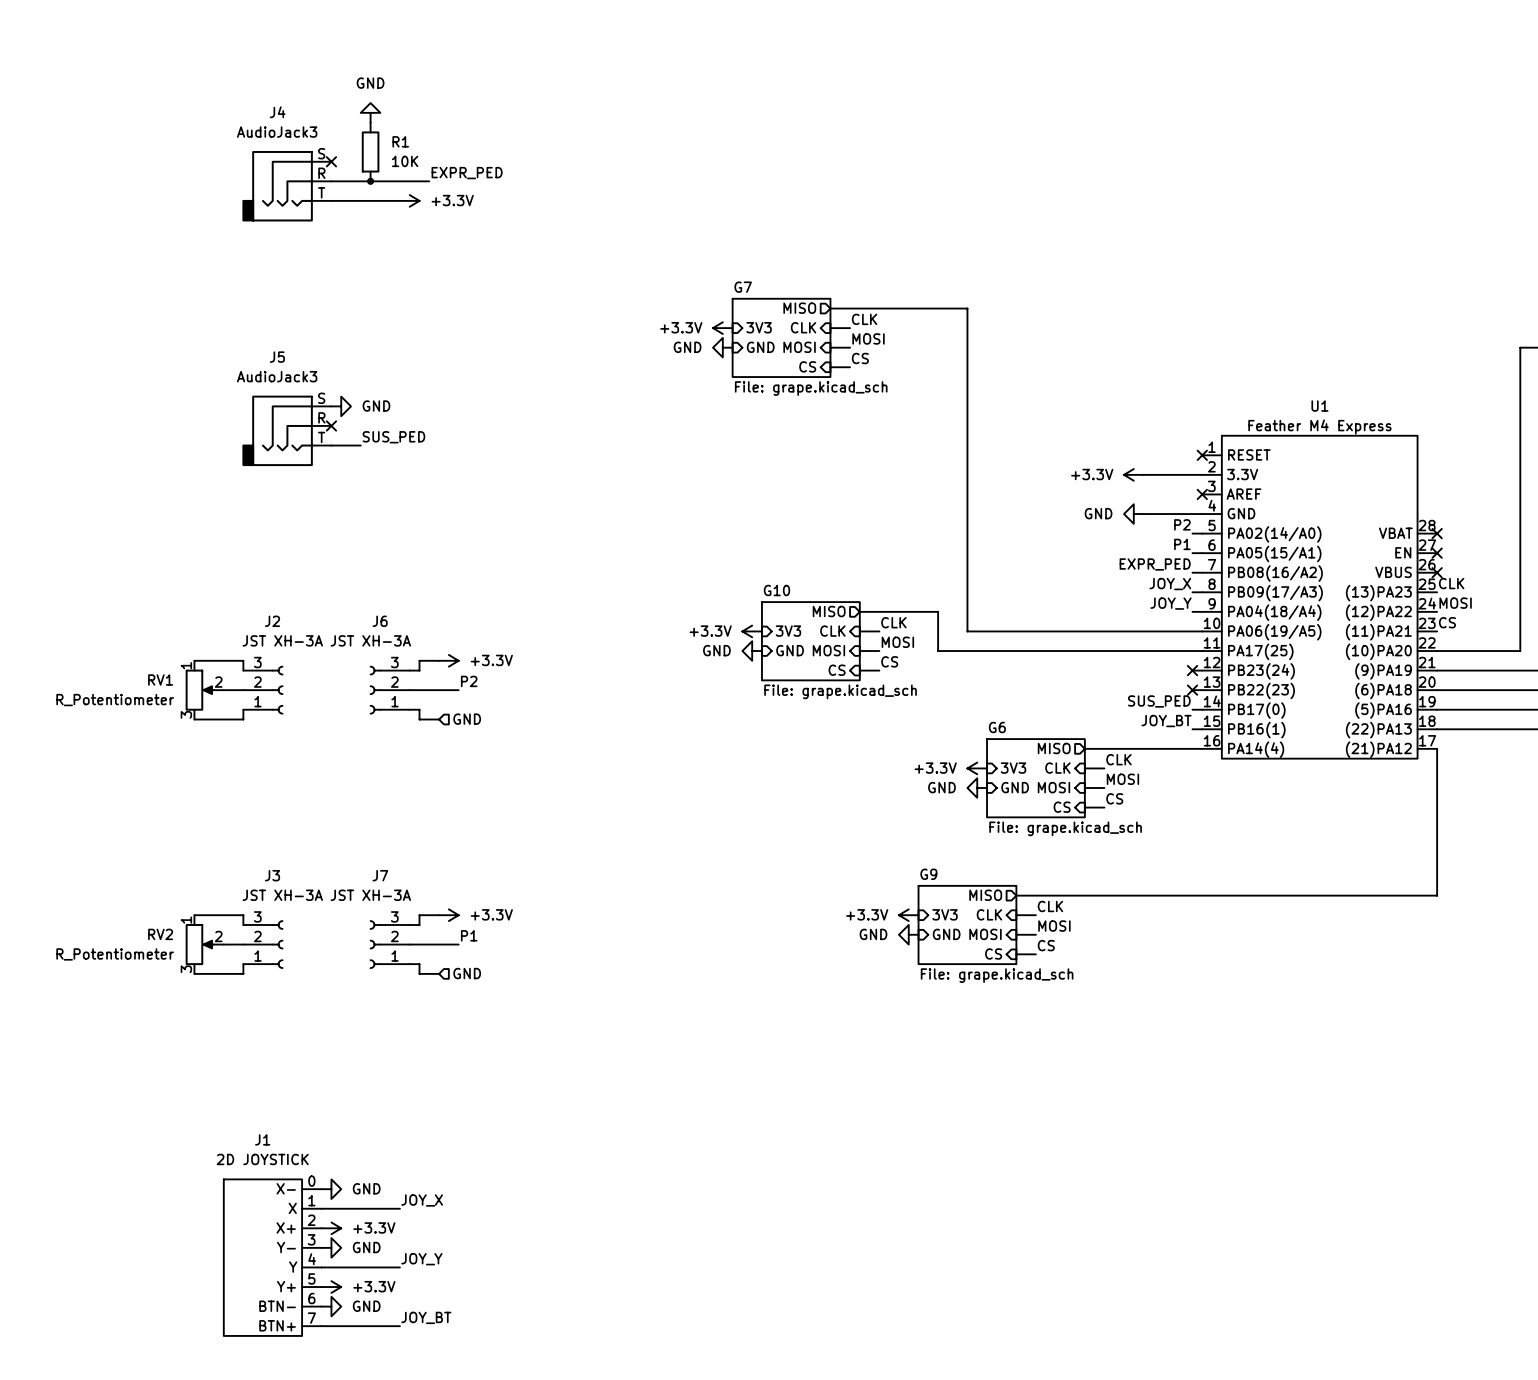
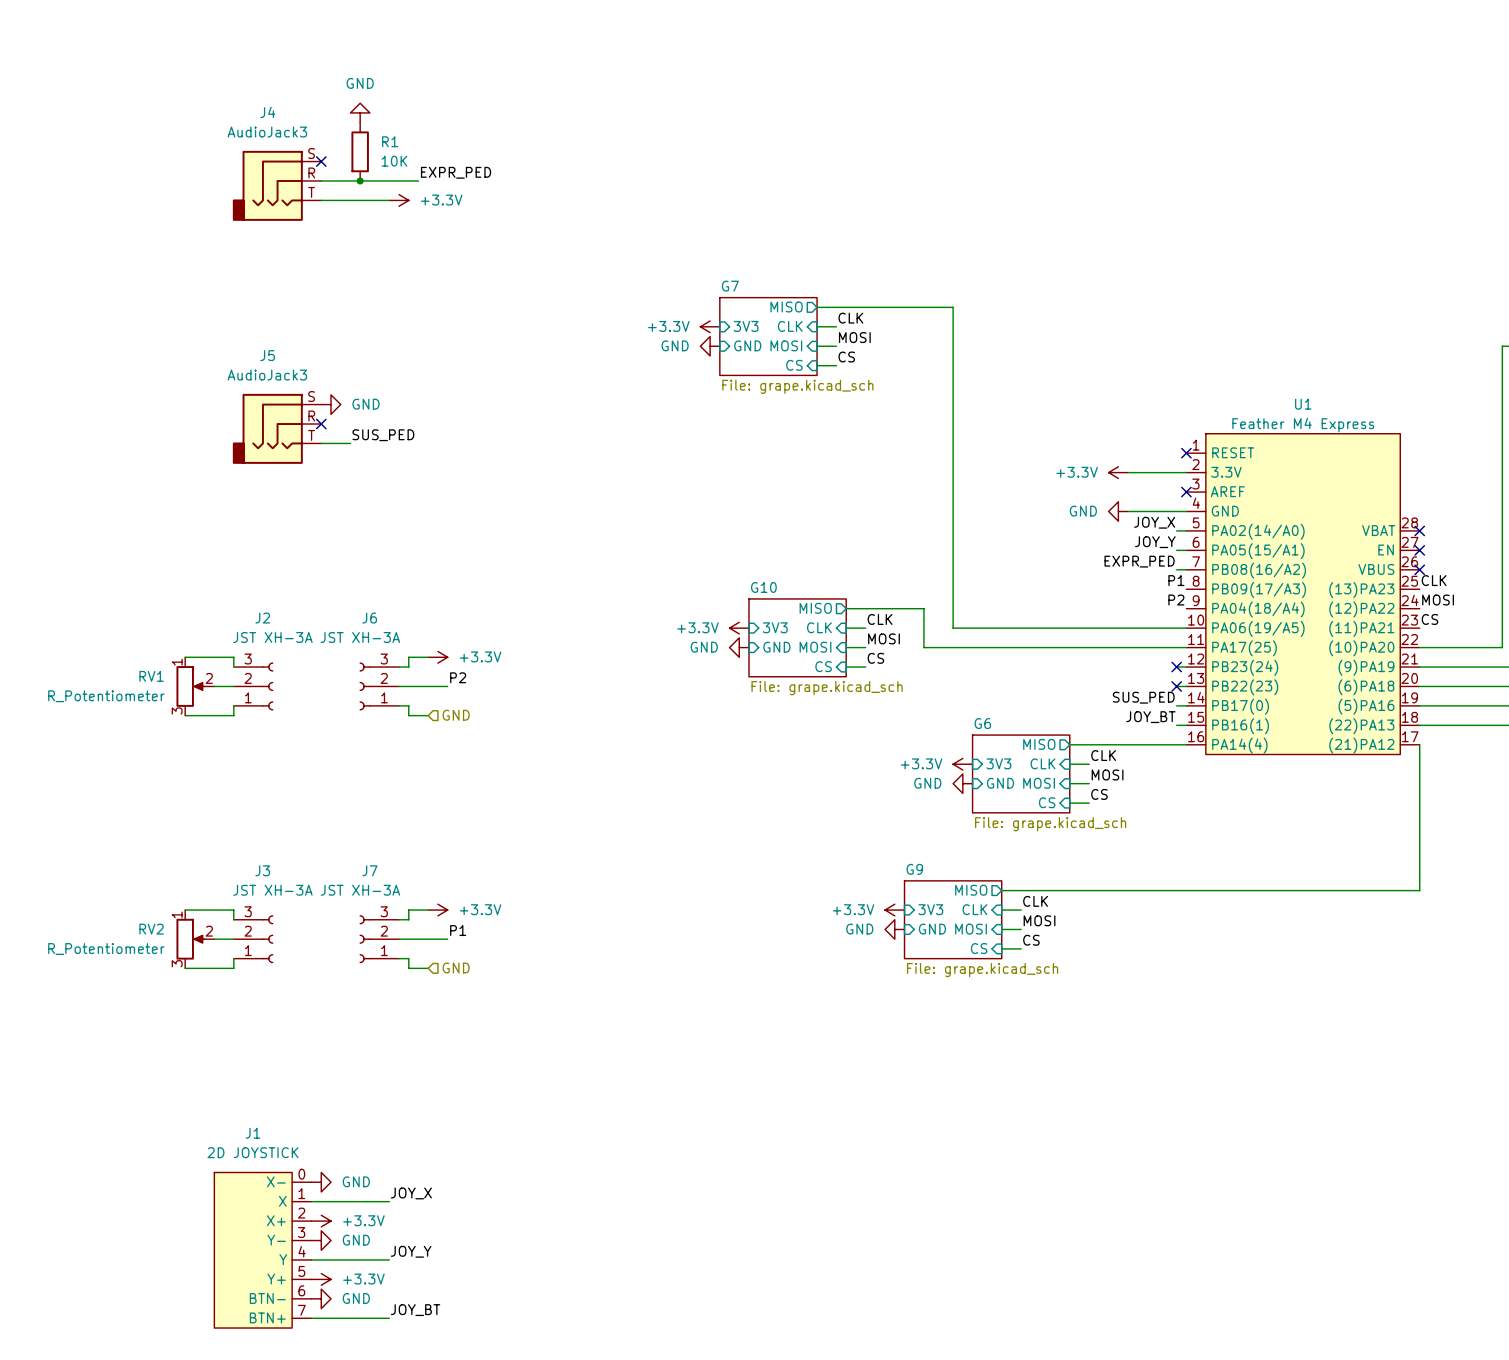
label: P2 (1182, 524) -> JOY_X (1154, 522)
label: P1 (1182, 544) -> JOY_Y (1155, 542)
label: none -> P1 (1176, 580)
label: JOY_X (1170, 584) -> none
wire: (1192, 592) (1202, 592) -> none
label: JOY_Y (1171, 603) -> none
label: none -> P2 (1176, 600)
wire: (1192, 611) (1202, 611) -> none

